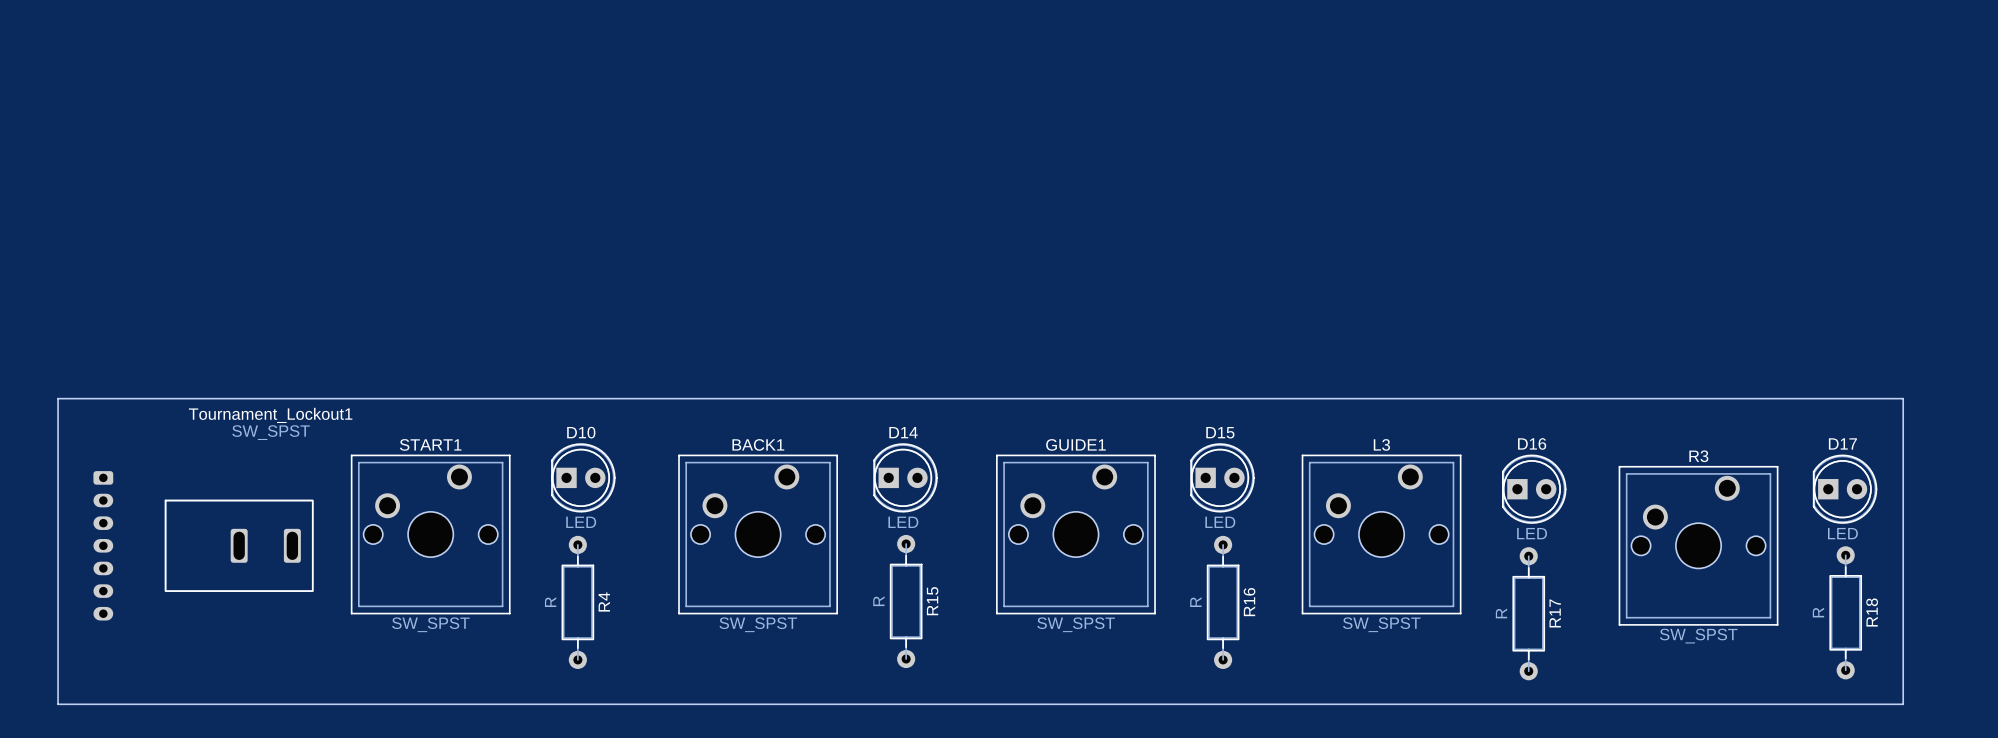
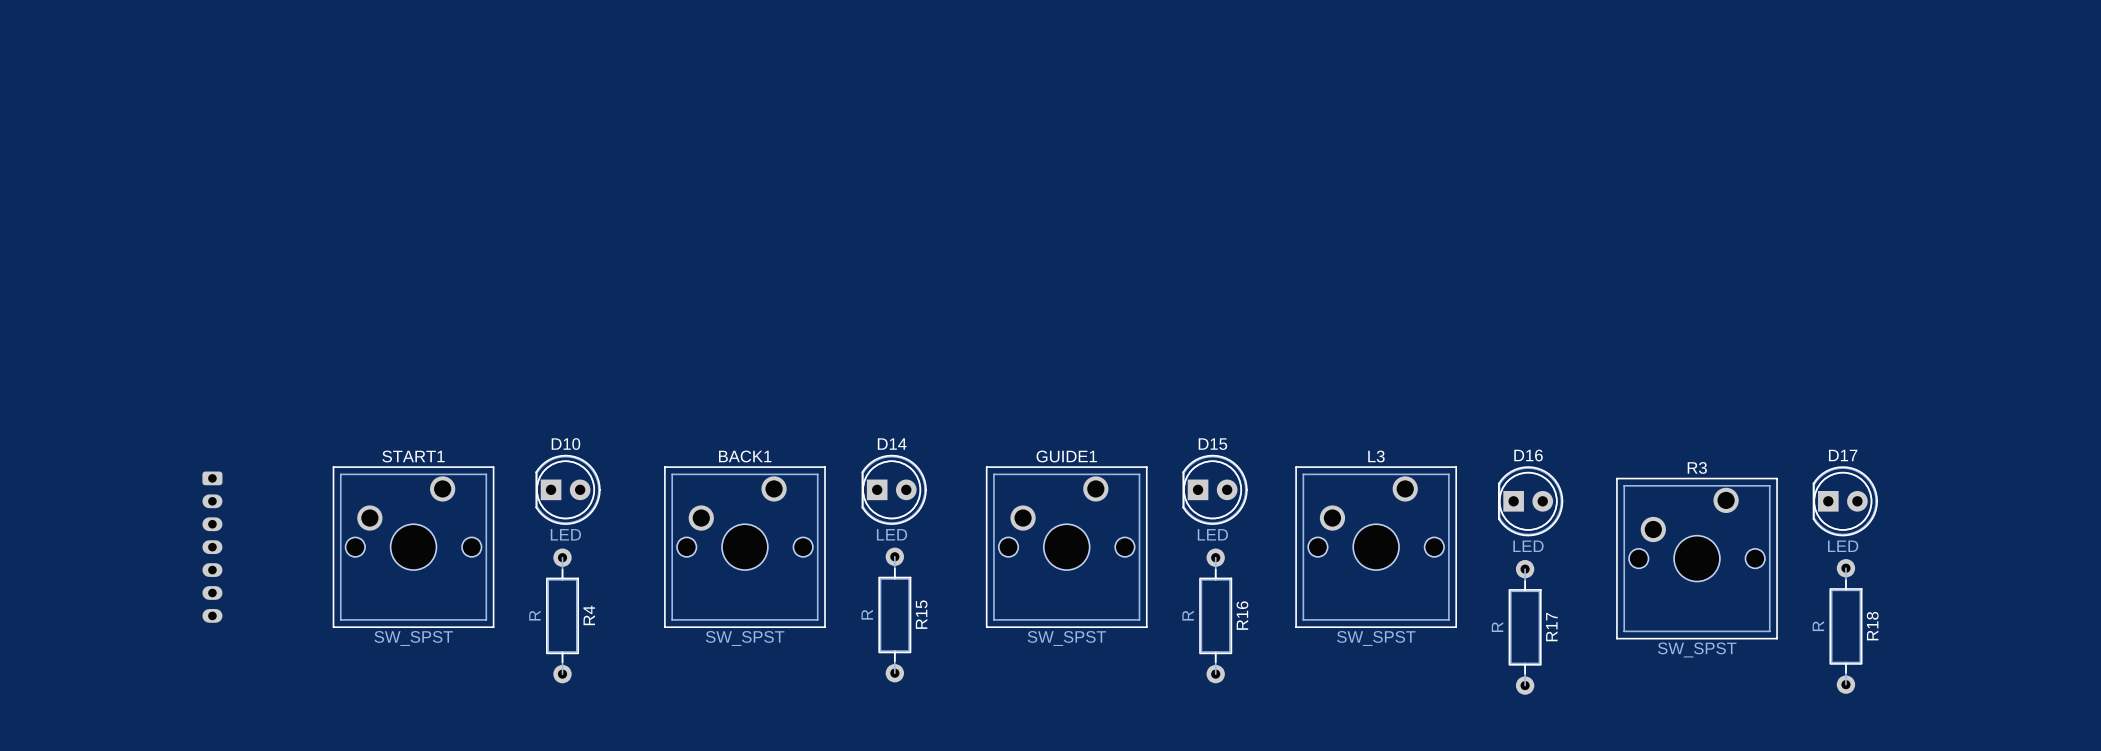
board edge: (58, 398) (1903, 398) (1903, 704) (58, 704) (58, 398) -> none
part position: (103, 545) -> (212, 547)
Tournament_Lockout1: SW_SPST (239, 545) -> none

